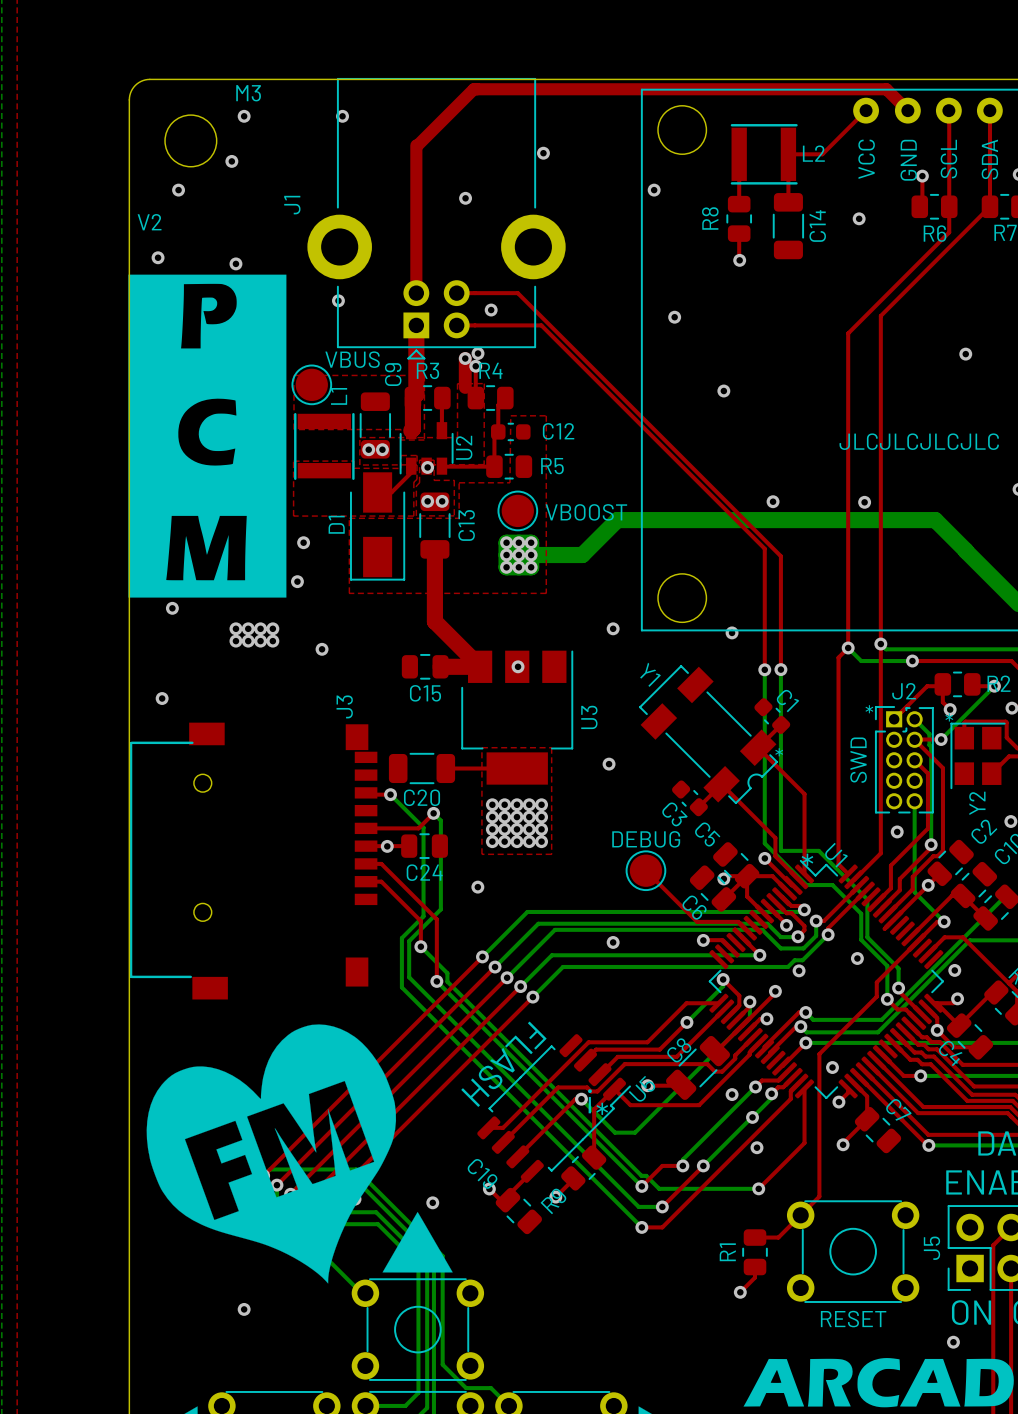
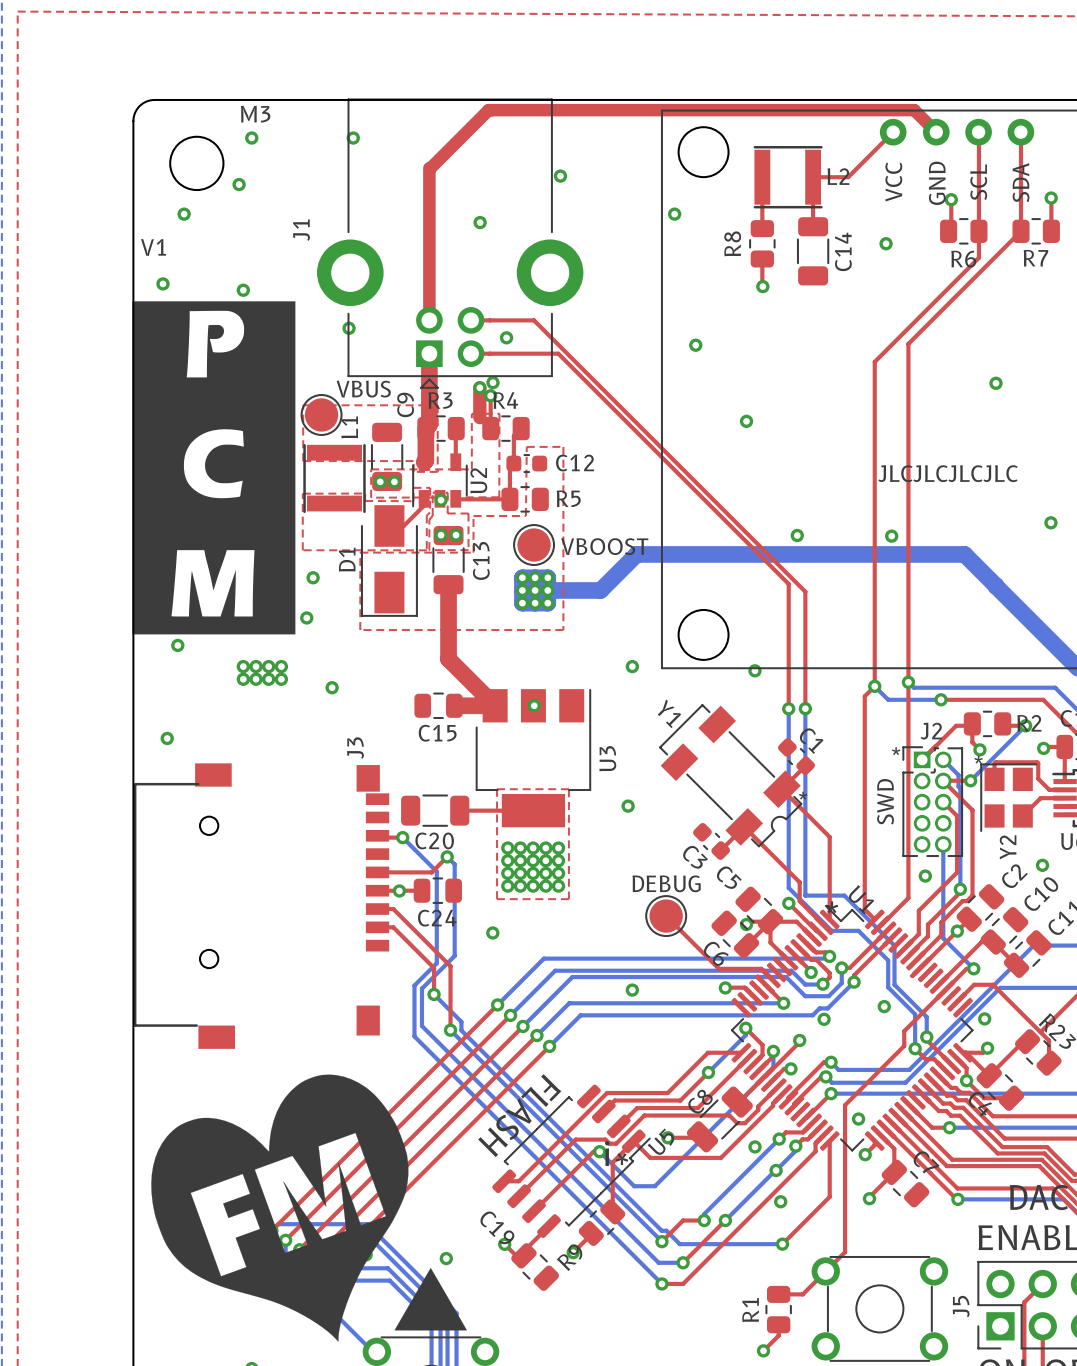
text: V2 (149, 222) -> V1 (153, 247)

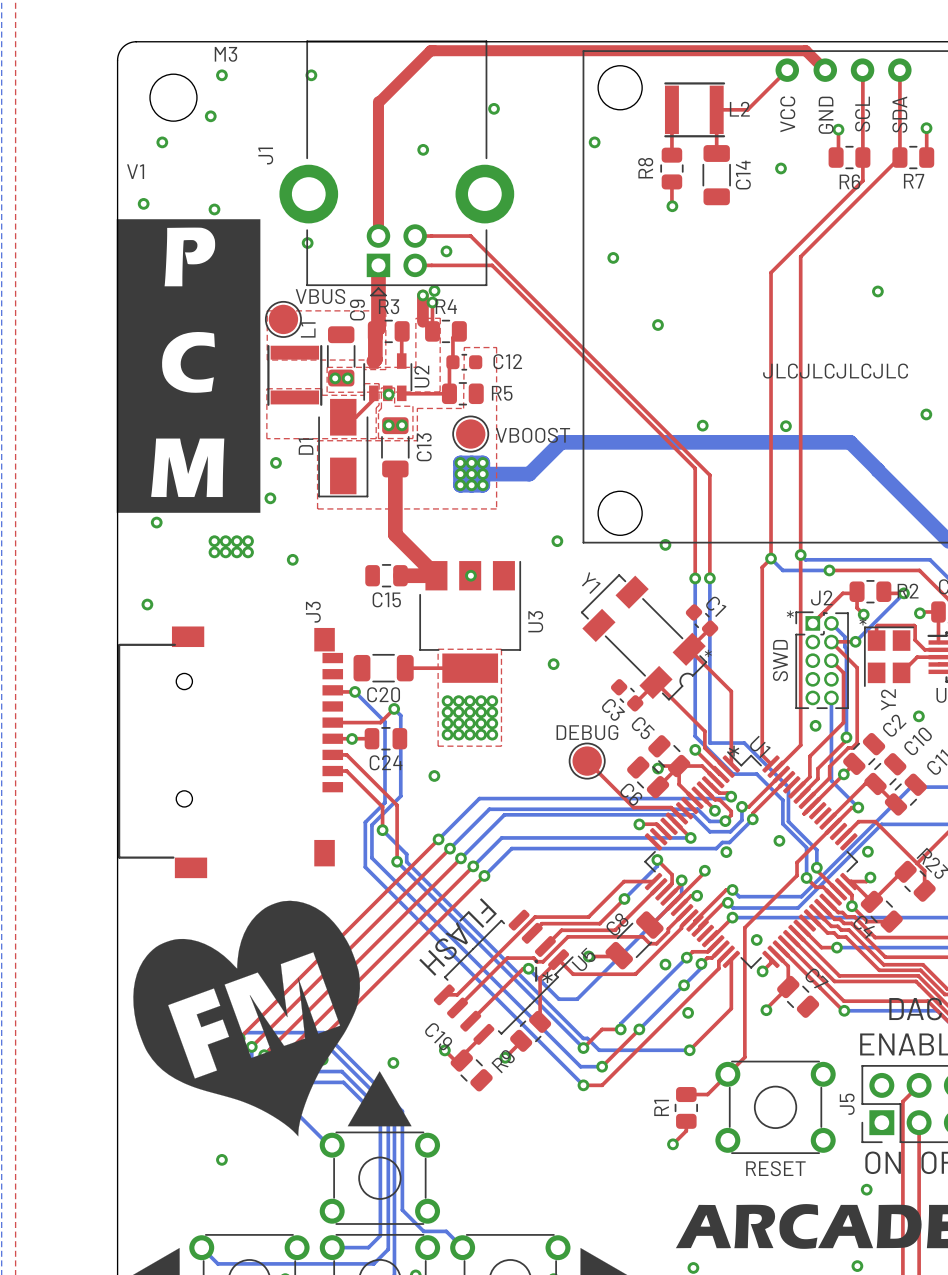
via: (632, 990) -> none

